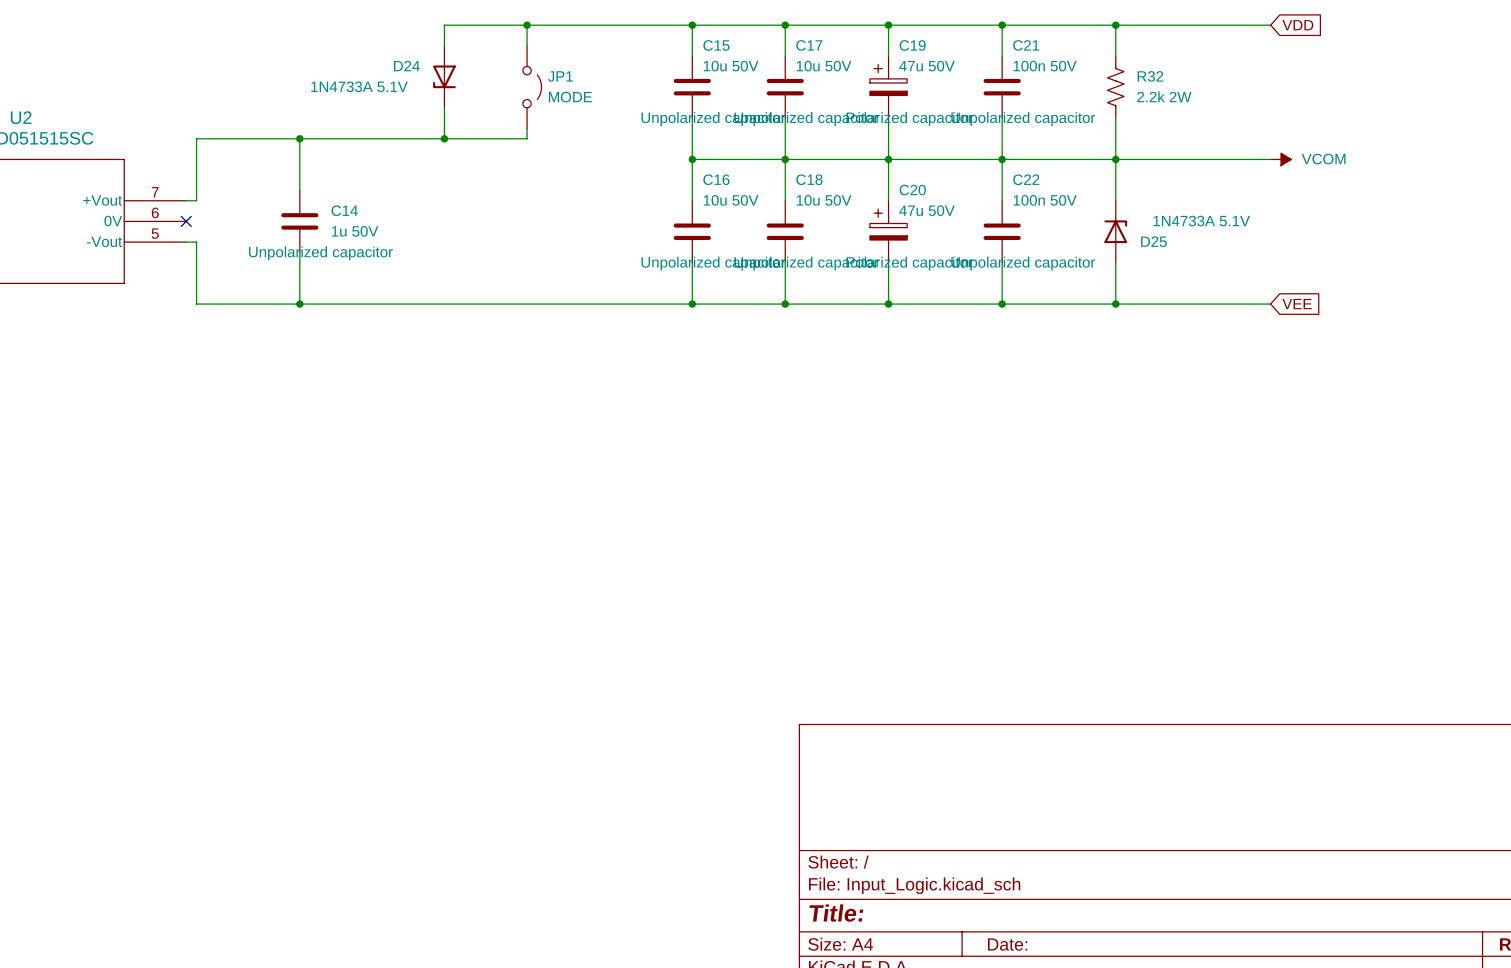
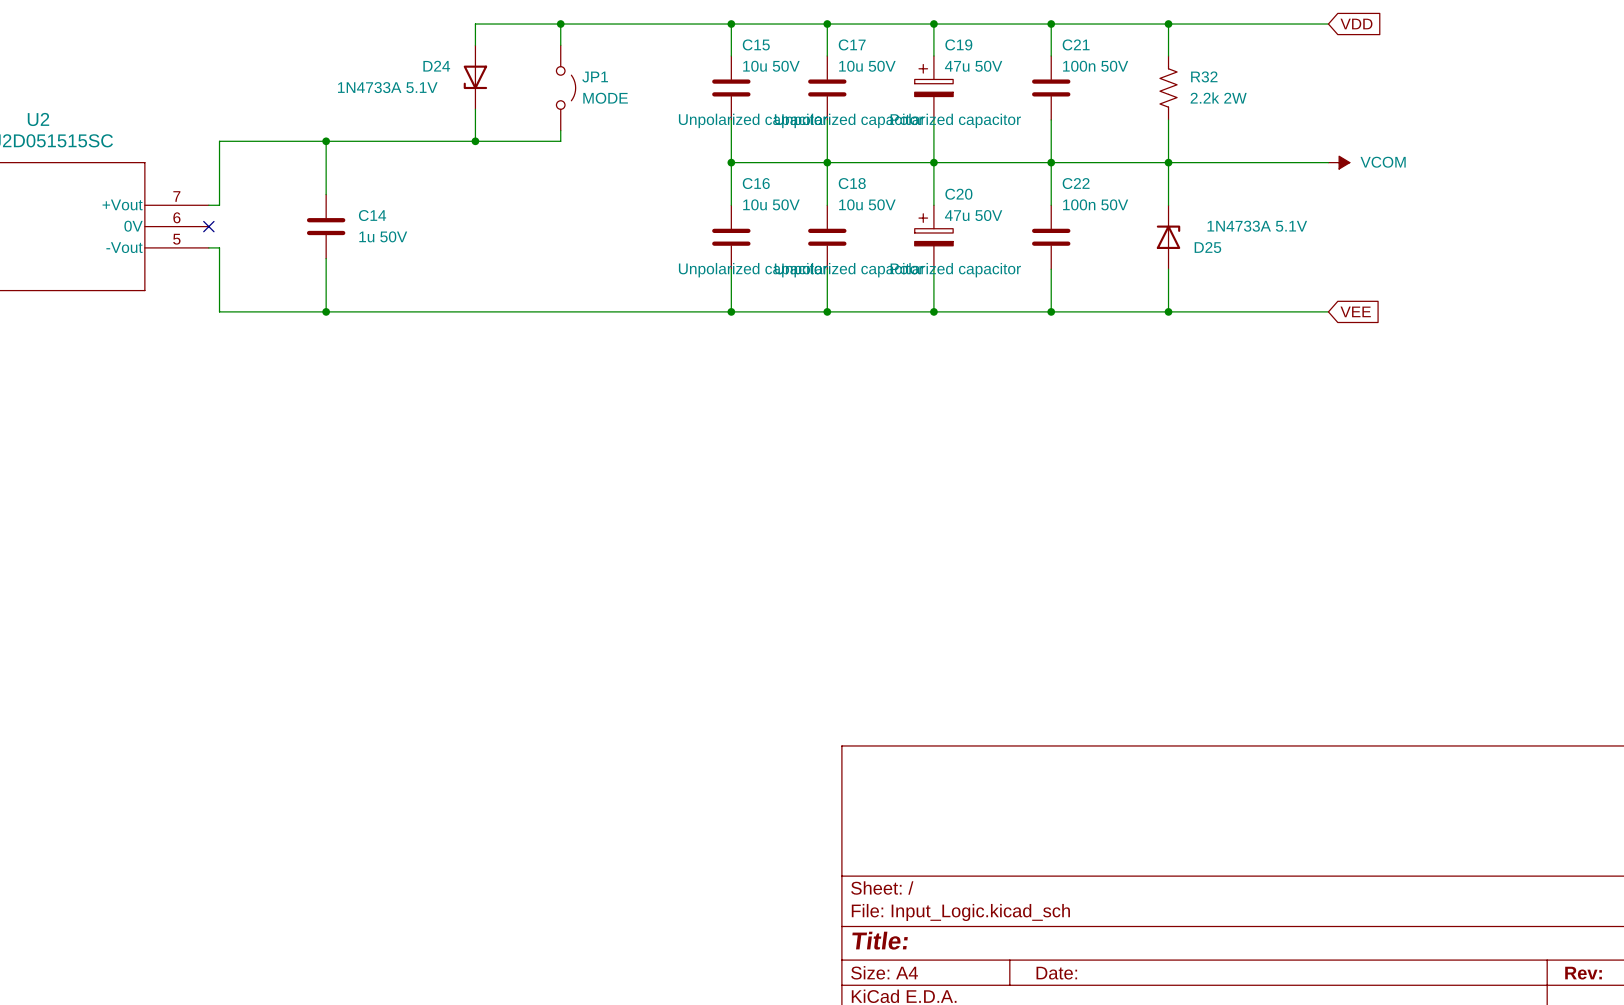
C21 text: Unpolarized capacitor (1023, 119) -> none
C14 text: Unpolarized capacitor (320, 253) -> none
C22 text: Unpolarized capacitor (1023, 263) -> none

